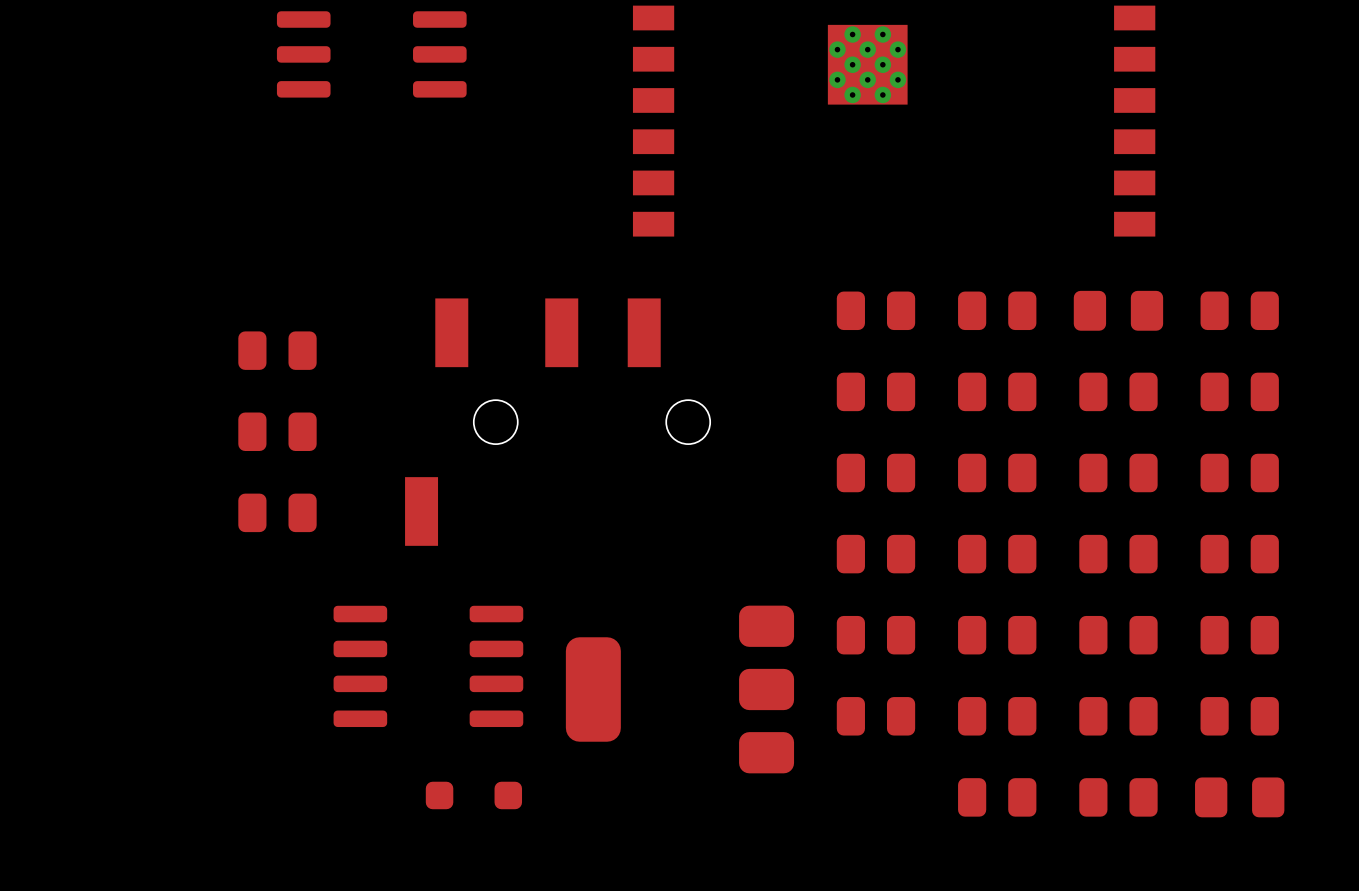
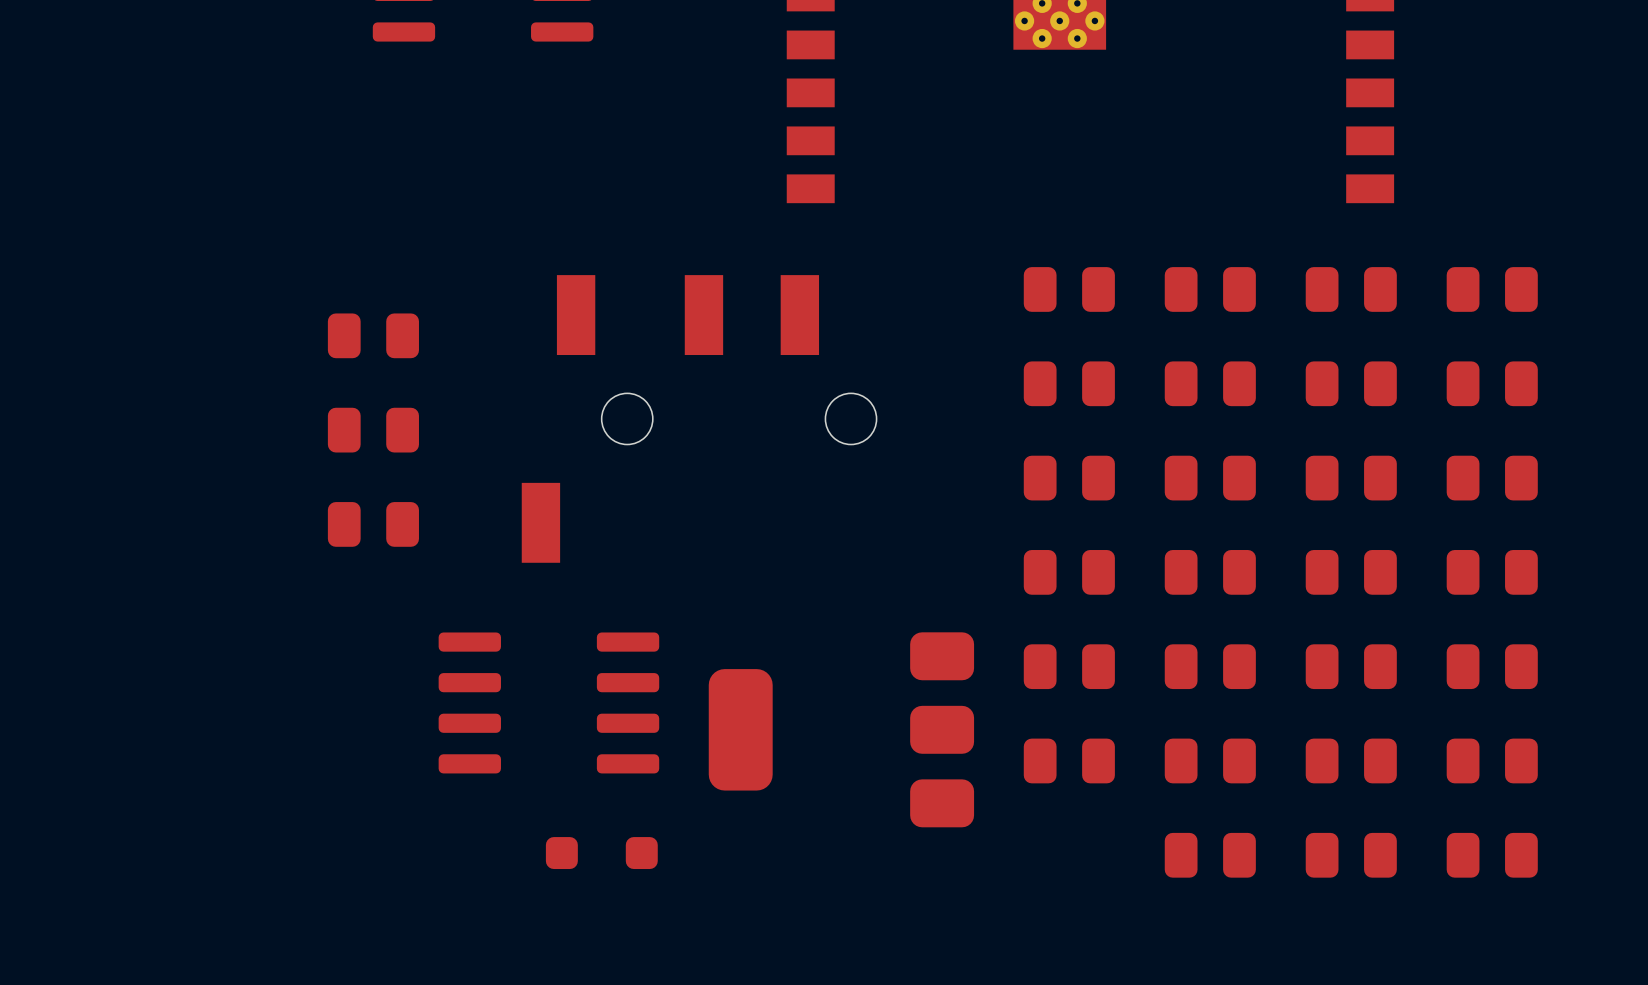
part footprint: [1073, 290, 1164, 331] -> [1305, 267, 1397, 312]
part footprint: [1195, 777, 1285, 818] -> [1446, 832, 1538, 878]

